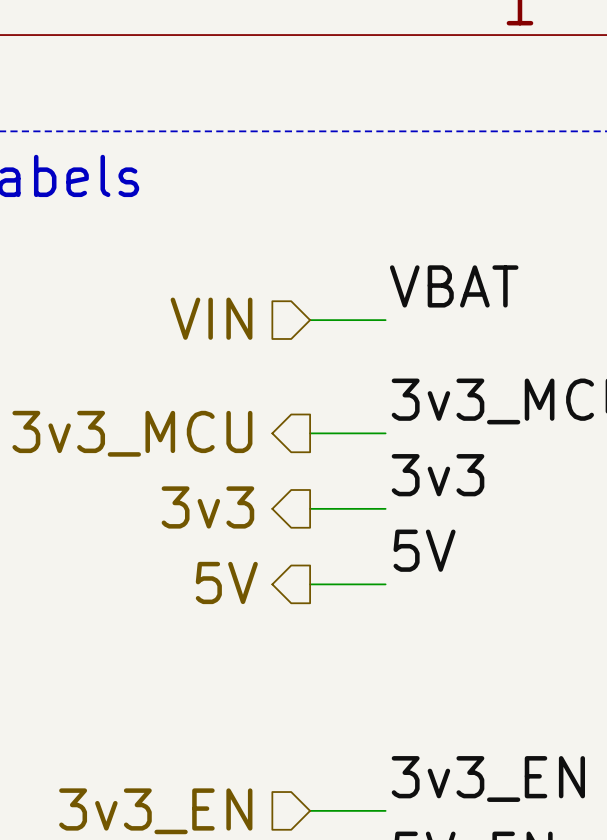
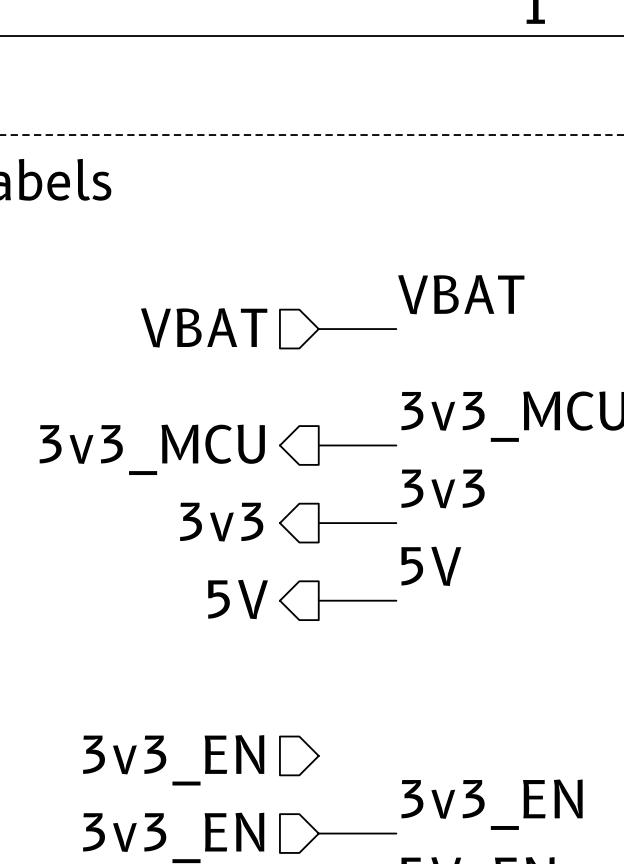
hierarchical label: VIN (211, 318) -> VBAT (204, 327)
hierarchical label: none -> 3v3_EN (173, 760)

